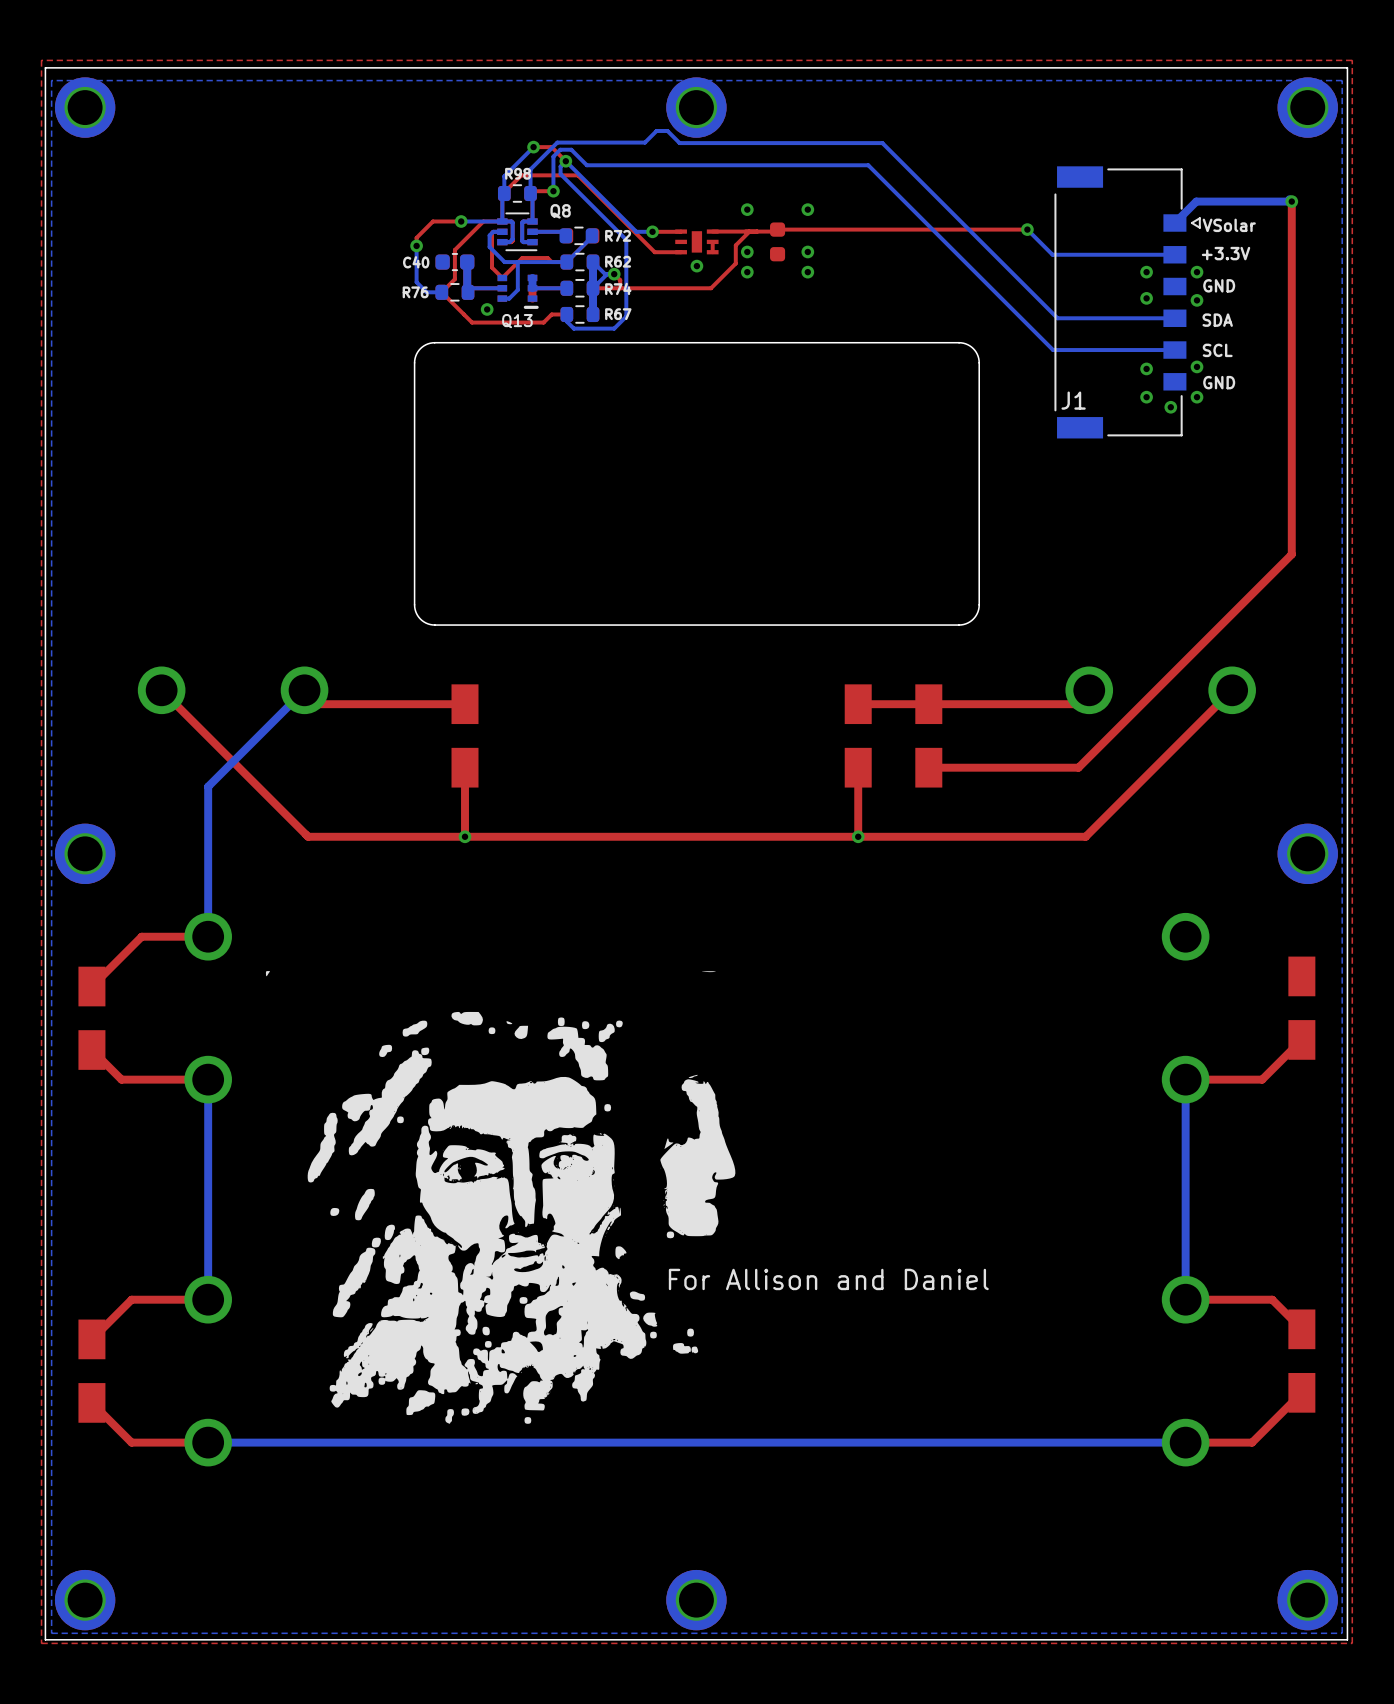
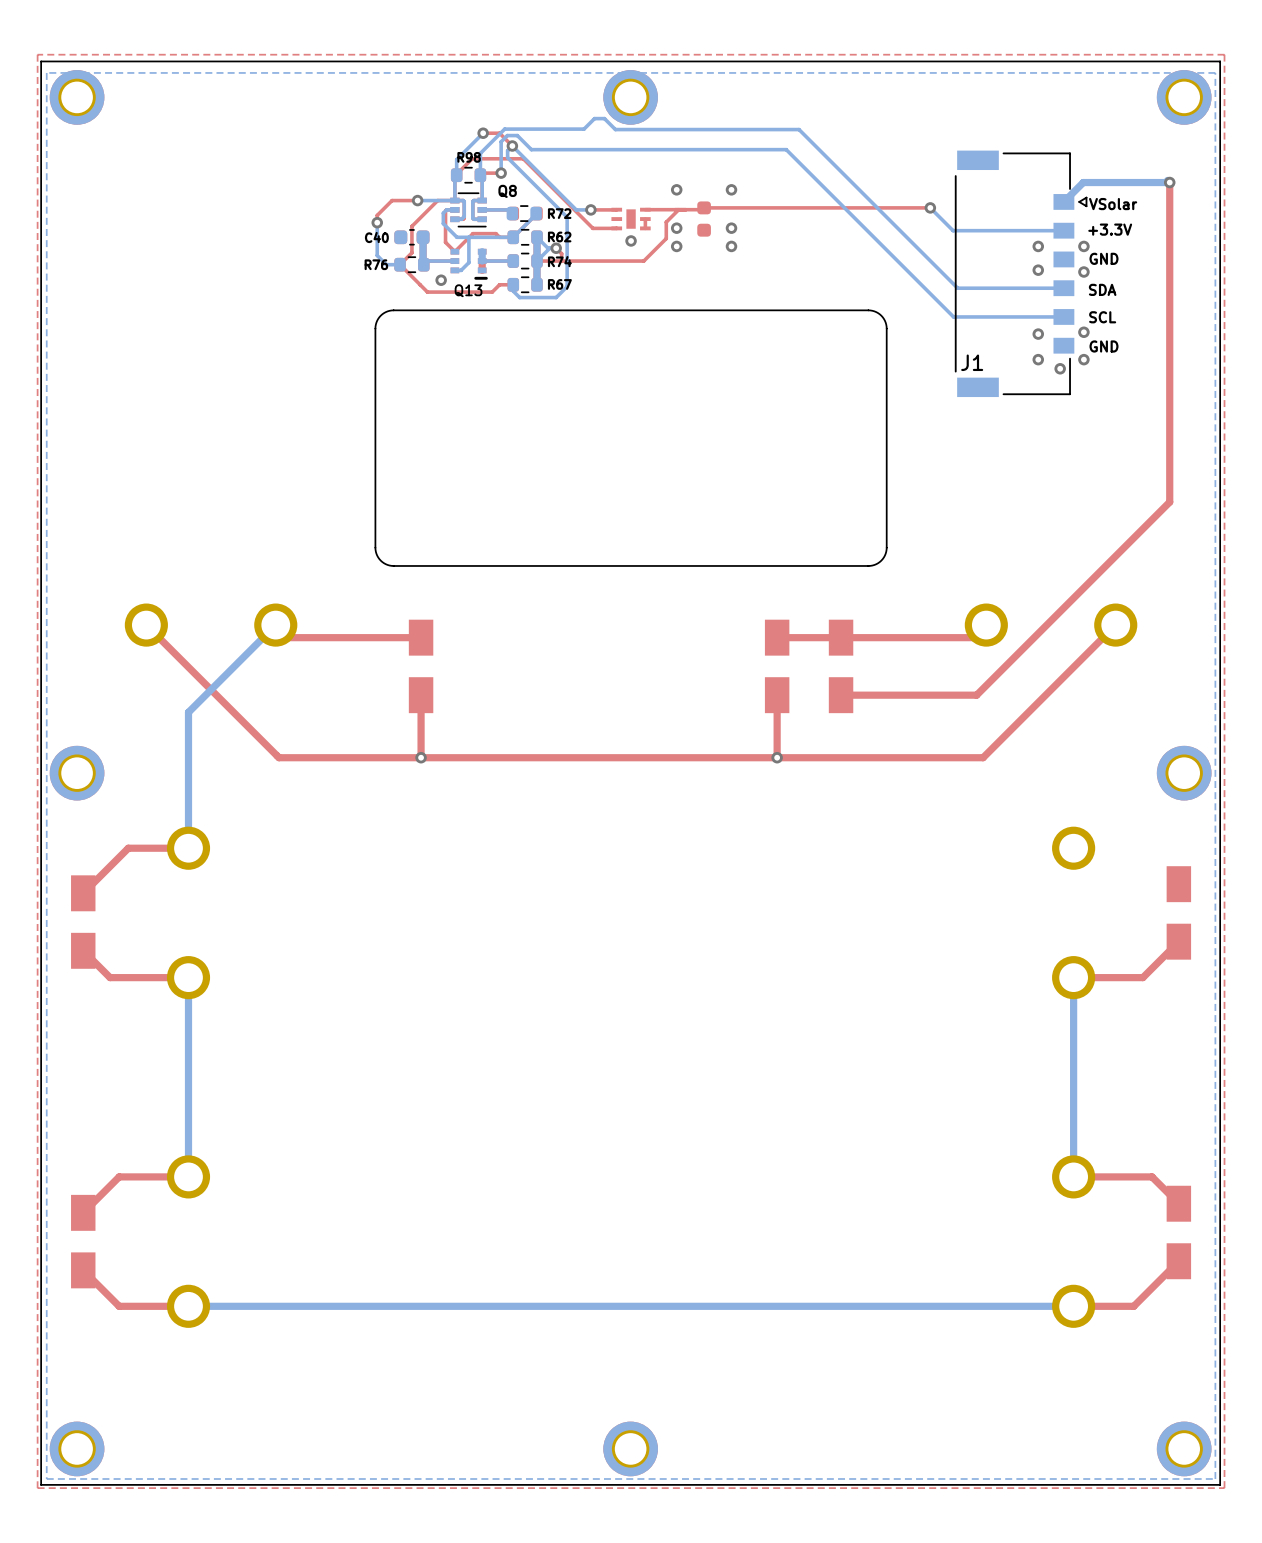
drawing: [265, 971, 736, 1424] -> none
text: For Allison and Daniel (828, 1279) -> none

